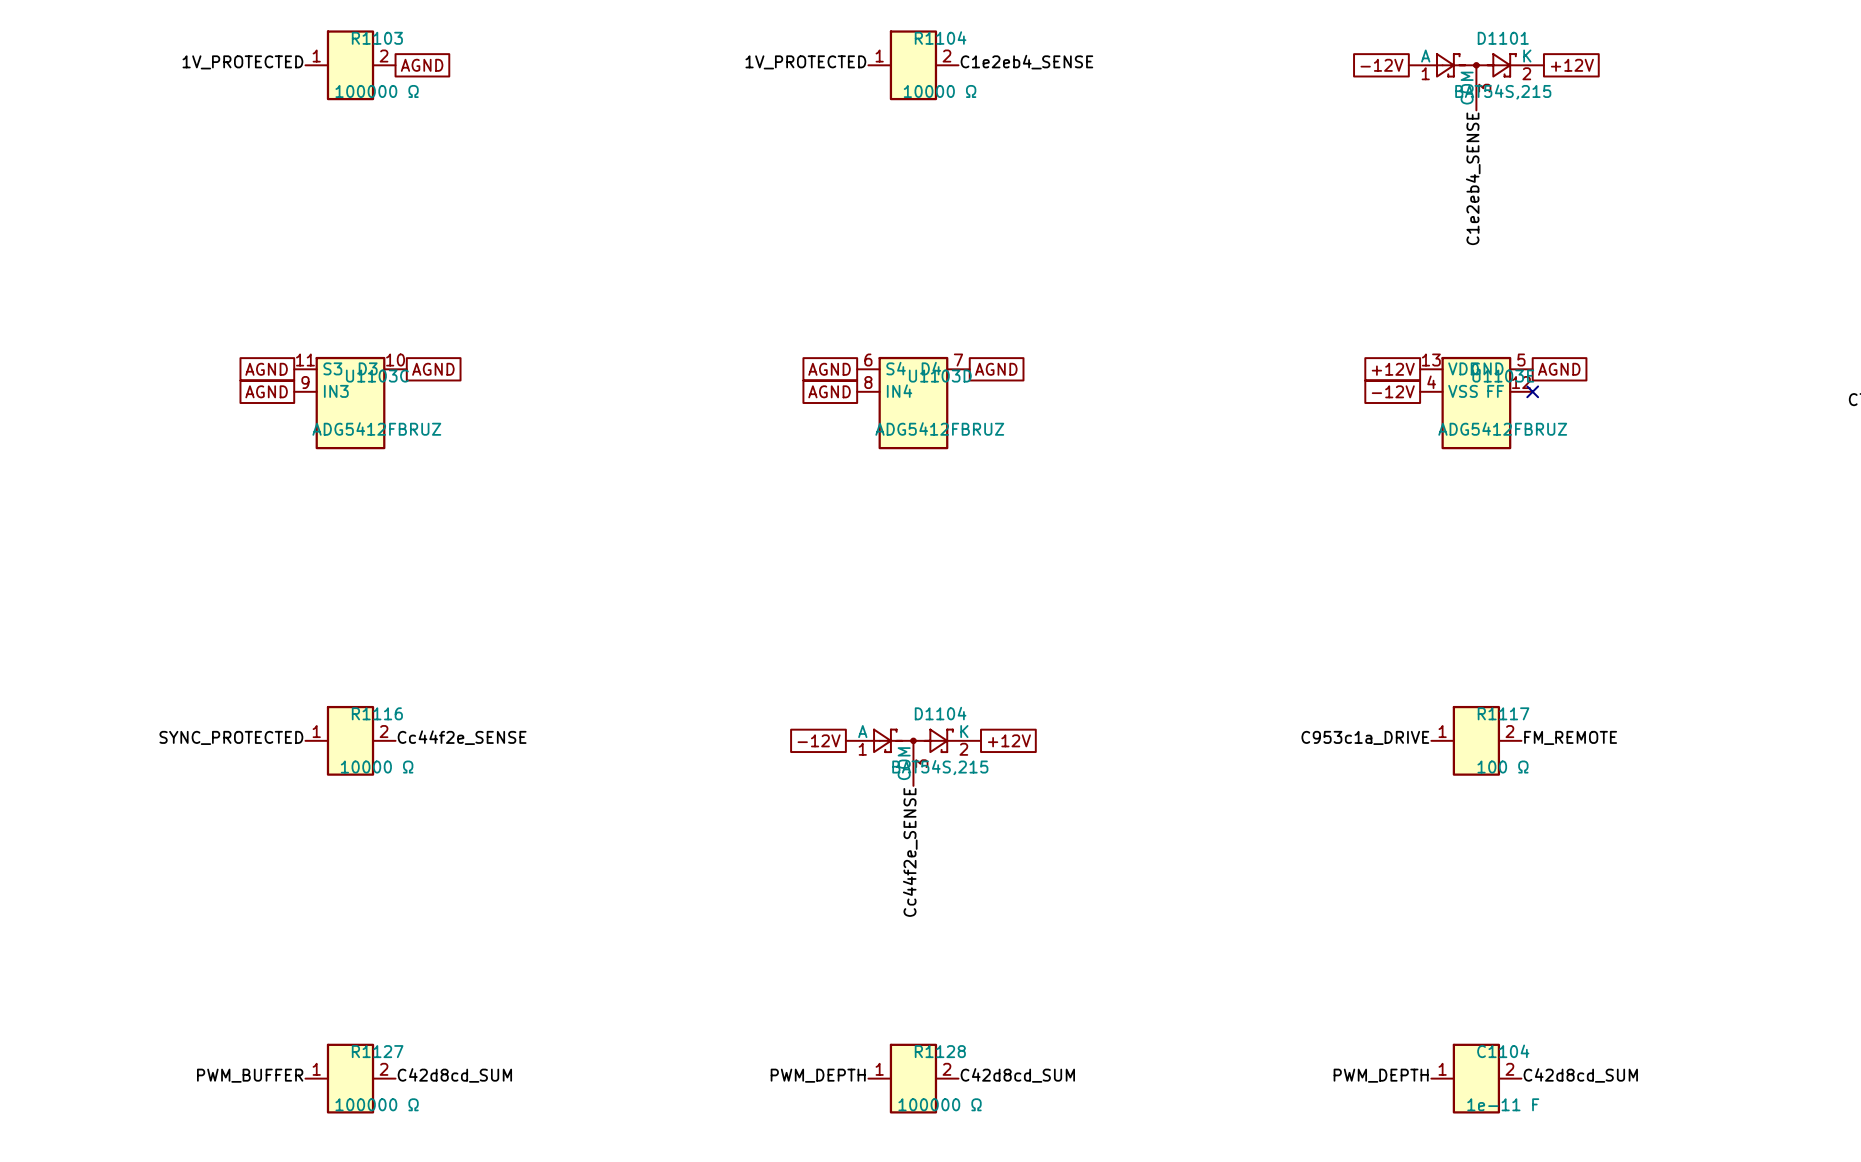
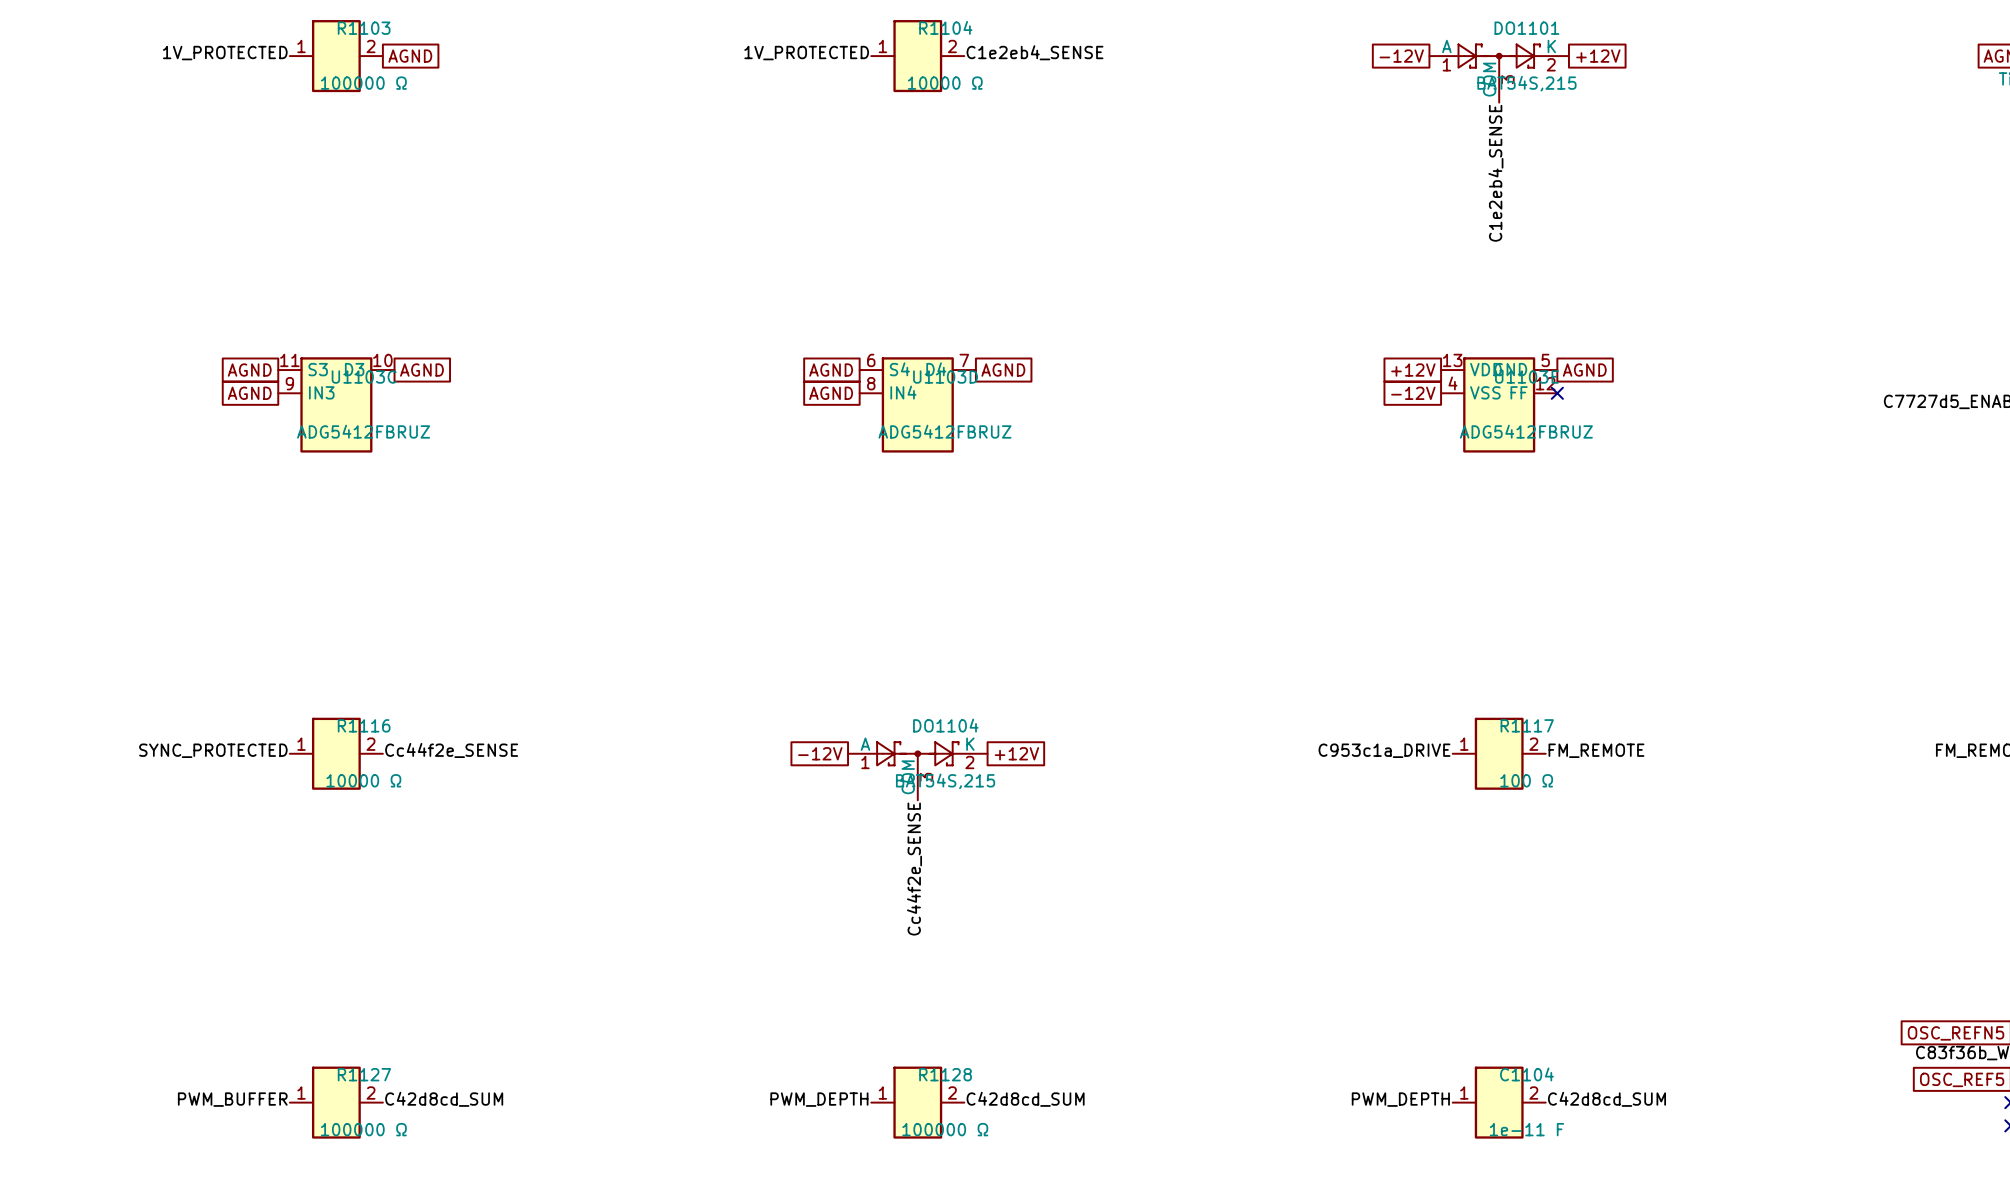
D1101 name: D1101 (1503, 38) -> DO1101 (1526, 28)
D1104 name: D1104 (940, 713) -> DO1104 (945, 725)

